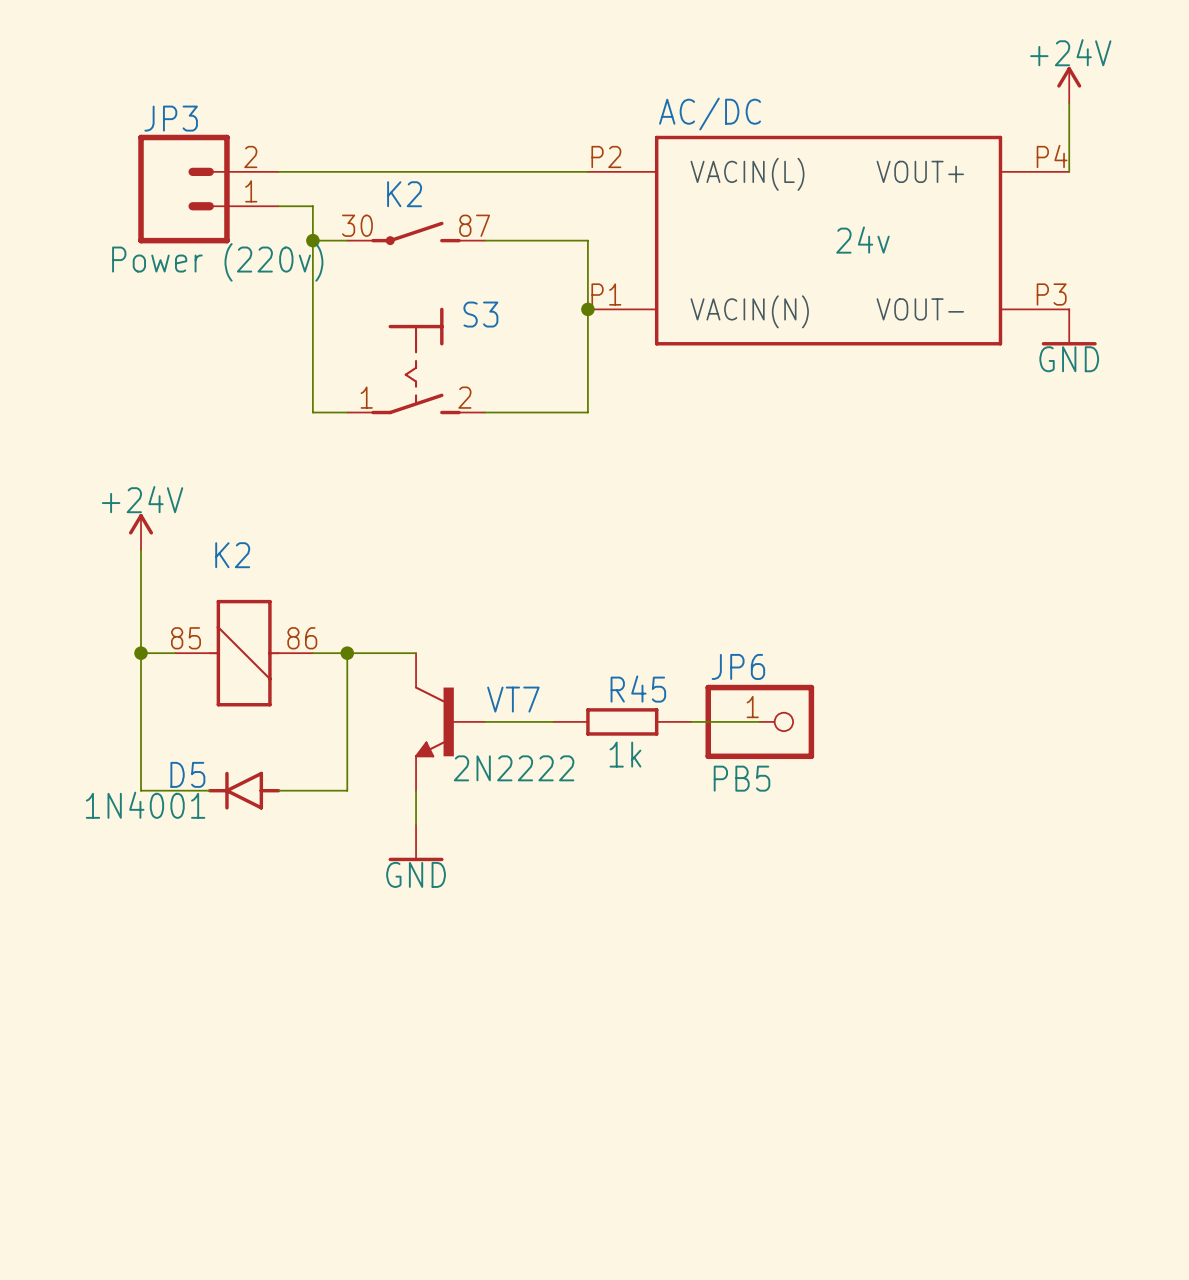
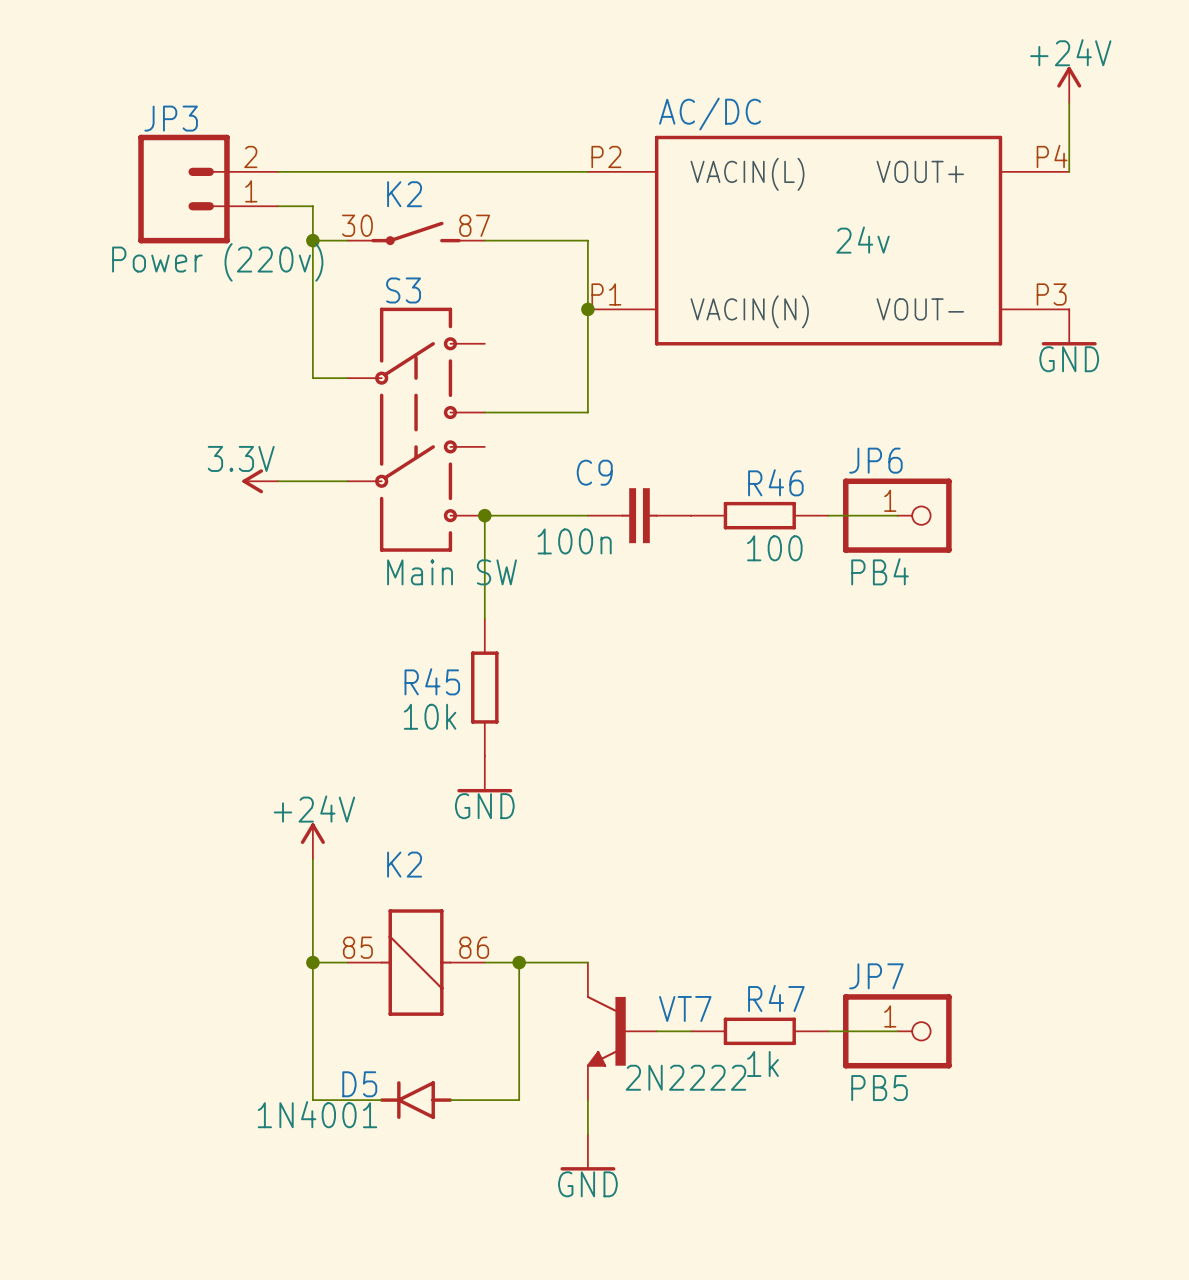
S3 symbol: [347, 307, 485, 415] -> [347, 307, 485, 552]
S3 name position: S3 (480, 314) -> S3 (403, 290)
wire: (312, 378) (312, 412) (347, 412) -> (312, 378) (347, 378)
power symbol: none -> 3.3V (260, 481)
junction: none -> (484, 515)
wire: none -> (587, 515) (484, 515) (484, 618)
C9: none -> 100n (639, 515)
R46: none -> 100 (759, 515)
power symbol: +24V (141, 531) -> none
wire: (141, 550) (141, 790) (209, 790) -> none
S3 value: none -> Main SW (452, 572)
wire: (141, 653) (175, 653) -> none
junction: (141, 653) -> none
K2: (244, 653) -> none
wire: (312, 653) (416, 653) -> none
wire: (347, 653) (347, 790) (278, 790) -> none
junction: (347, 653) -> none
R45 name position: R45 (638, 689) -> R45 (432, 681)
VT7 position: (449, 721) -> (621, 1031)
wire: (484, 721) (553, 721) -> (278, 481) (347, 481)
R45 rotation: 0° (622, 721) -> 90° clockwise (484, 687)
R45 position: (622, 721) -> (484, 687)
wire: (691, 721) (759, 721) -> (828, 515) (897, 515)
JP6 position: (759, 721) -> (897, 515)
R45 value: 1k (625, 754) -> 10k (430, 716)
JP6 value: PB5 (742, 778) -> PB4 (880, 571)
D5 position: (244, 790) -> (416, 1100)
wire: (416, 790) (416, 825) -> none
power symbol: none -> +24V (312, 841)
power symbol position: GND (416, 843) -> GND (484, 774)
wire: none -> (312, 859) (312, 1100) (381, 1100)
wire: none -> (312, 962) (347, 962)
junction: none -> (312, 962)
K2: none -> (416, 962)
wire: none -> (484, 962) (587, 962)
wire: none -> (519, 962) (519, 1100) (450, 1100)
junction: none -> (519, 962)
wire: none -> (656, 1031) (691, 1031)
R47: none -> 1k (759, 1031)
wire: none -> (828, 1031) (897, 1031)
JP7: none -> PB5 (897, 1031)
wire: none -> (587, 1100) (587, 1134)
power symbol: none -> GND (587, 1152)

